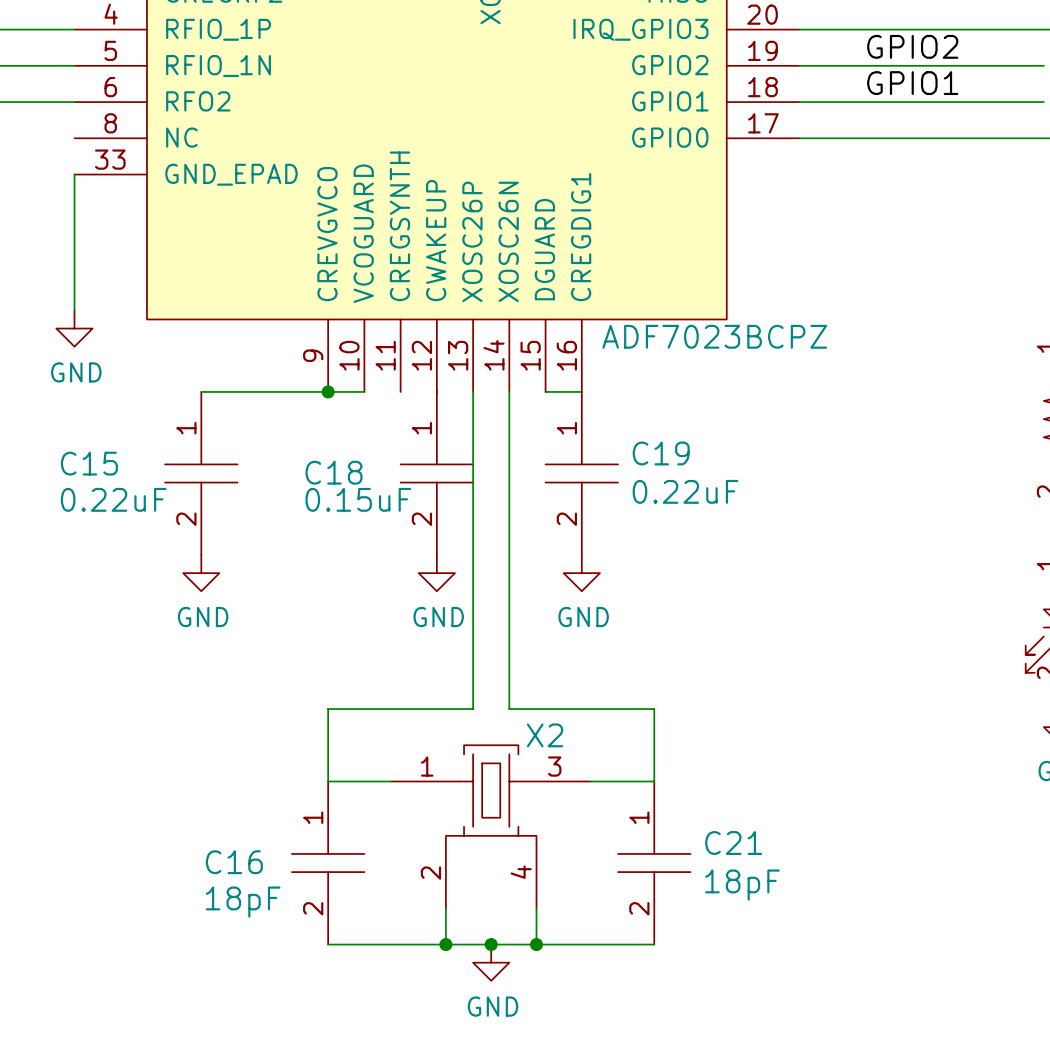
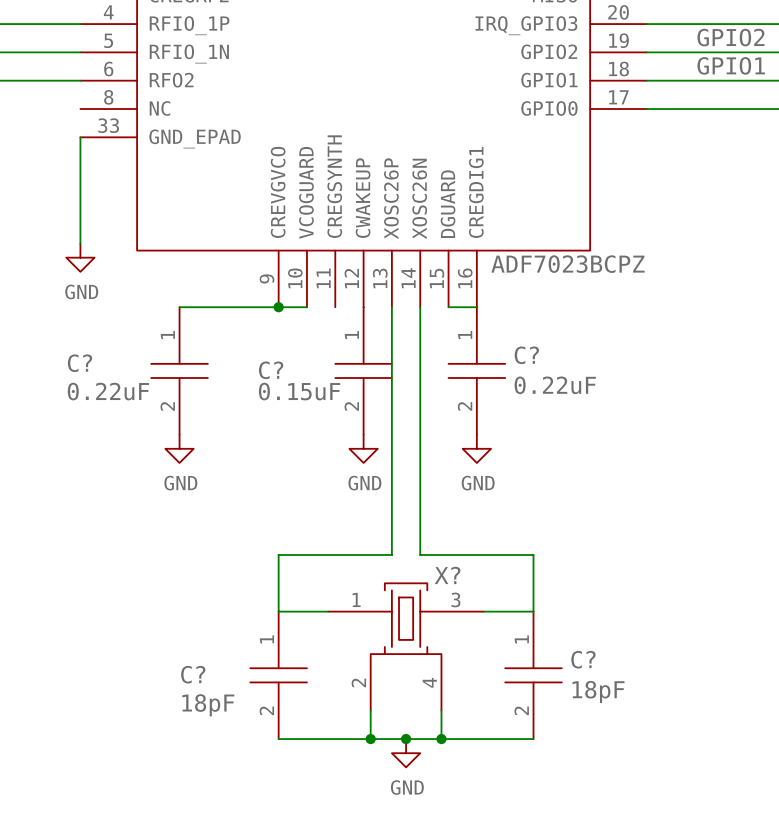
C19 name: C19 (661, 453) -> C? (526, 355)
C15 name: C15 (89, 463) -> C? (80, 363)
C18 name: C18 (333, 472) -> C? (271, 370)
X2 name: X2 (545, 735) -> X? (447, 575)
C21 name: C21 (733, 843) -> C? (583, 659)
C16 name: C16 (234, 862) -> C? (193, 674)

